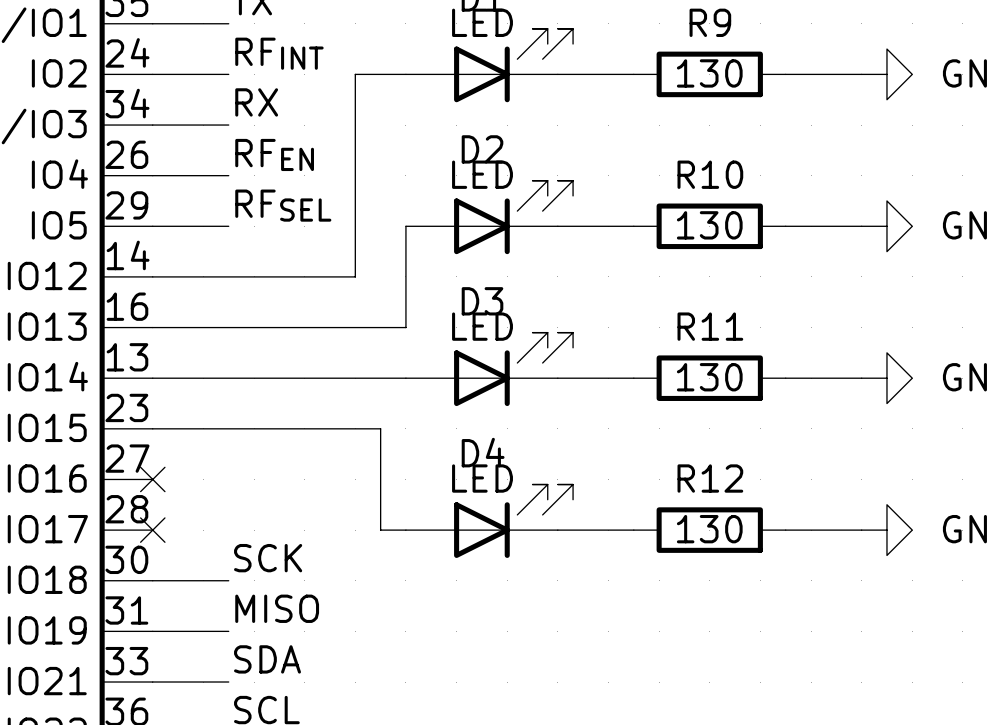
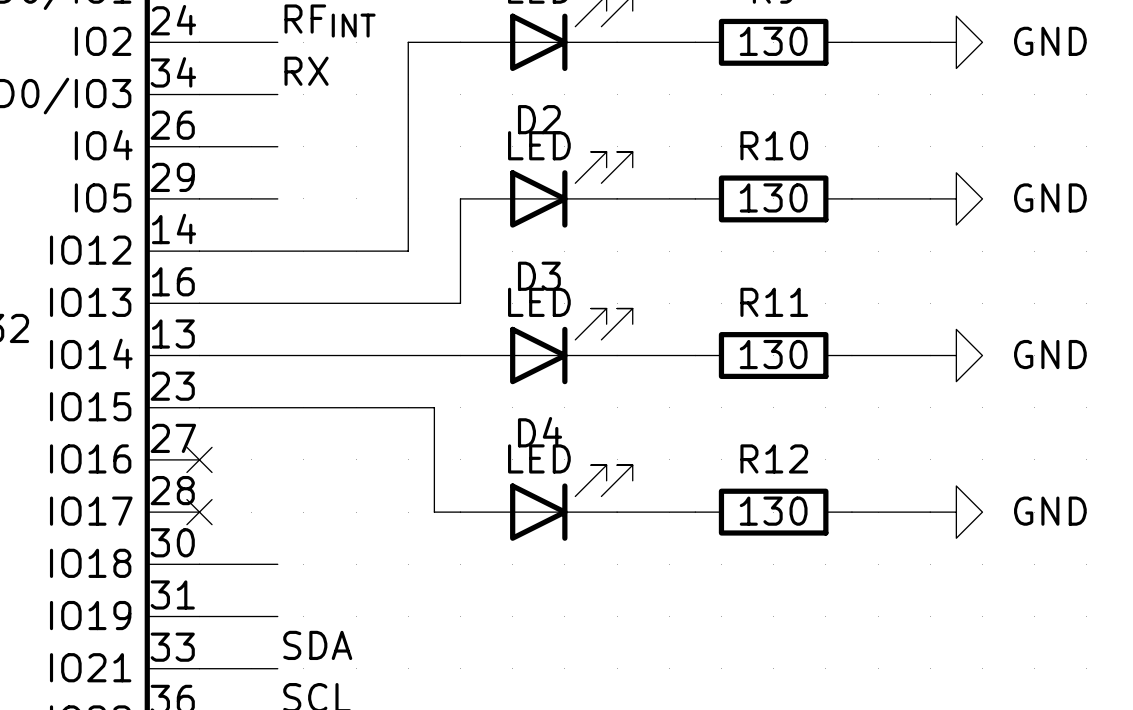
label: RFEN (274, 154) -> none
label: RFSEL (283, 205) -> none
label: SCK (268, 558) -> none
label: MISO (277, 608) -> none

